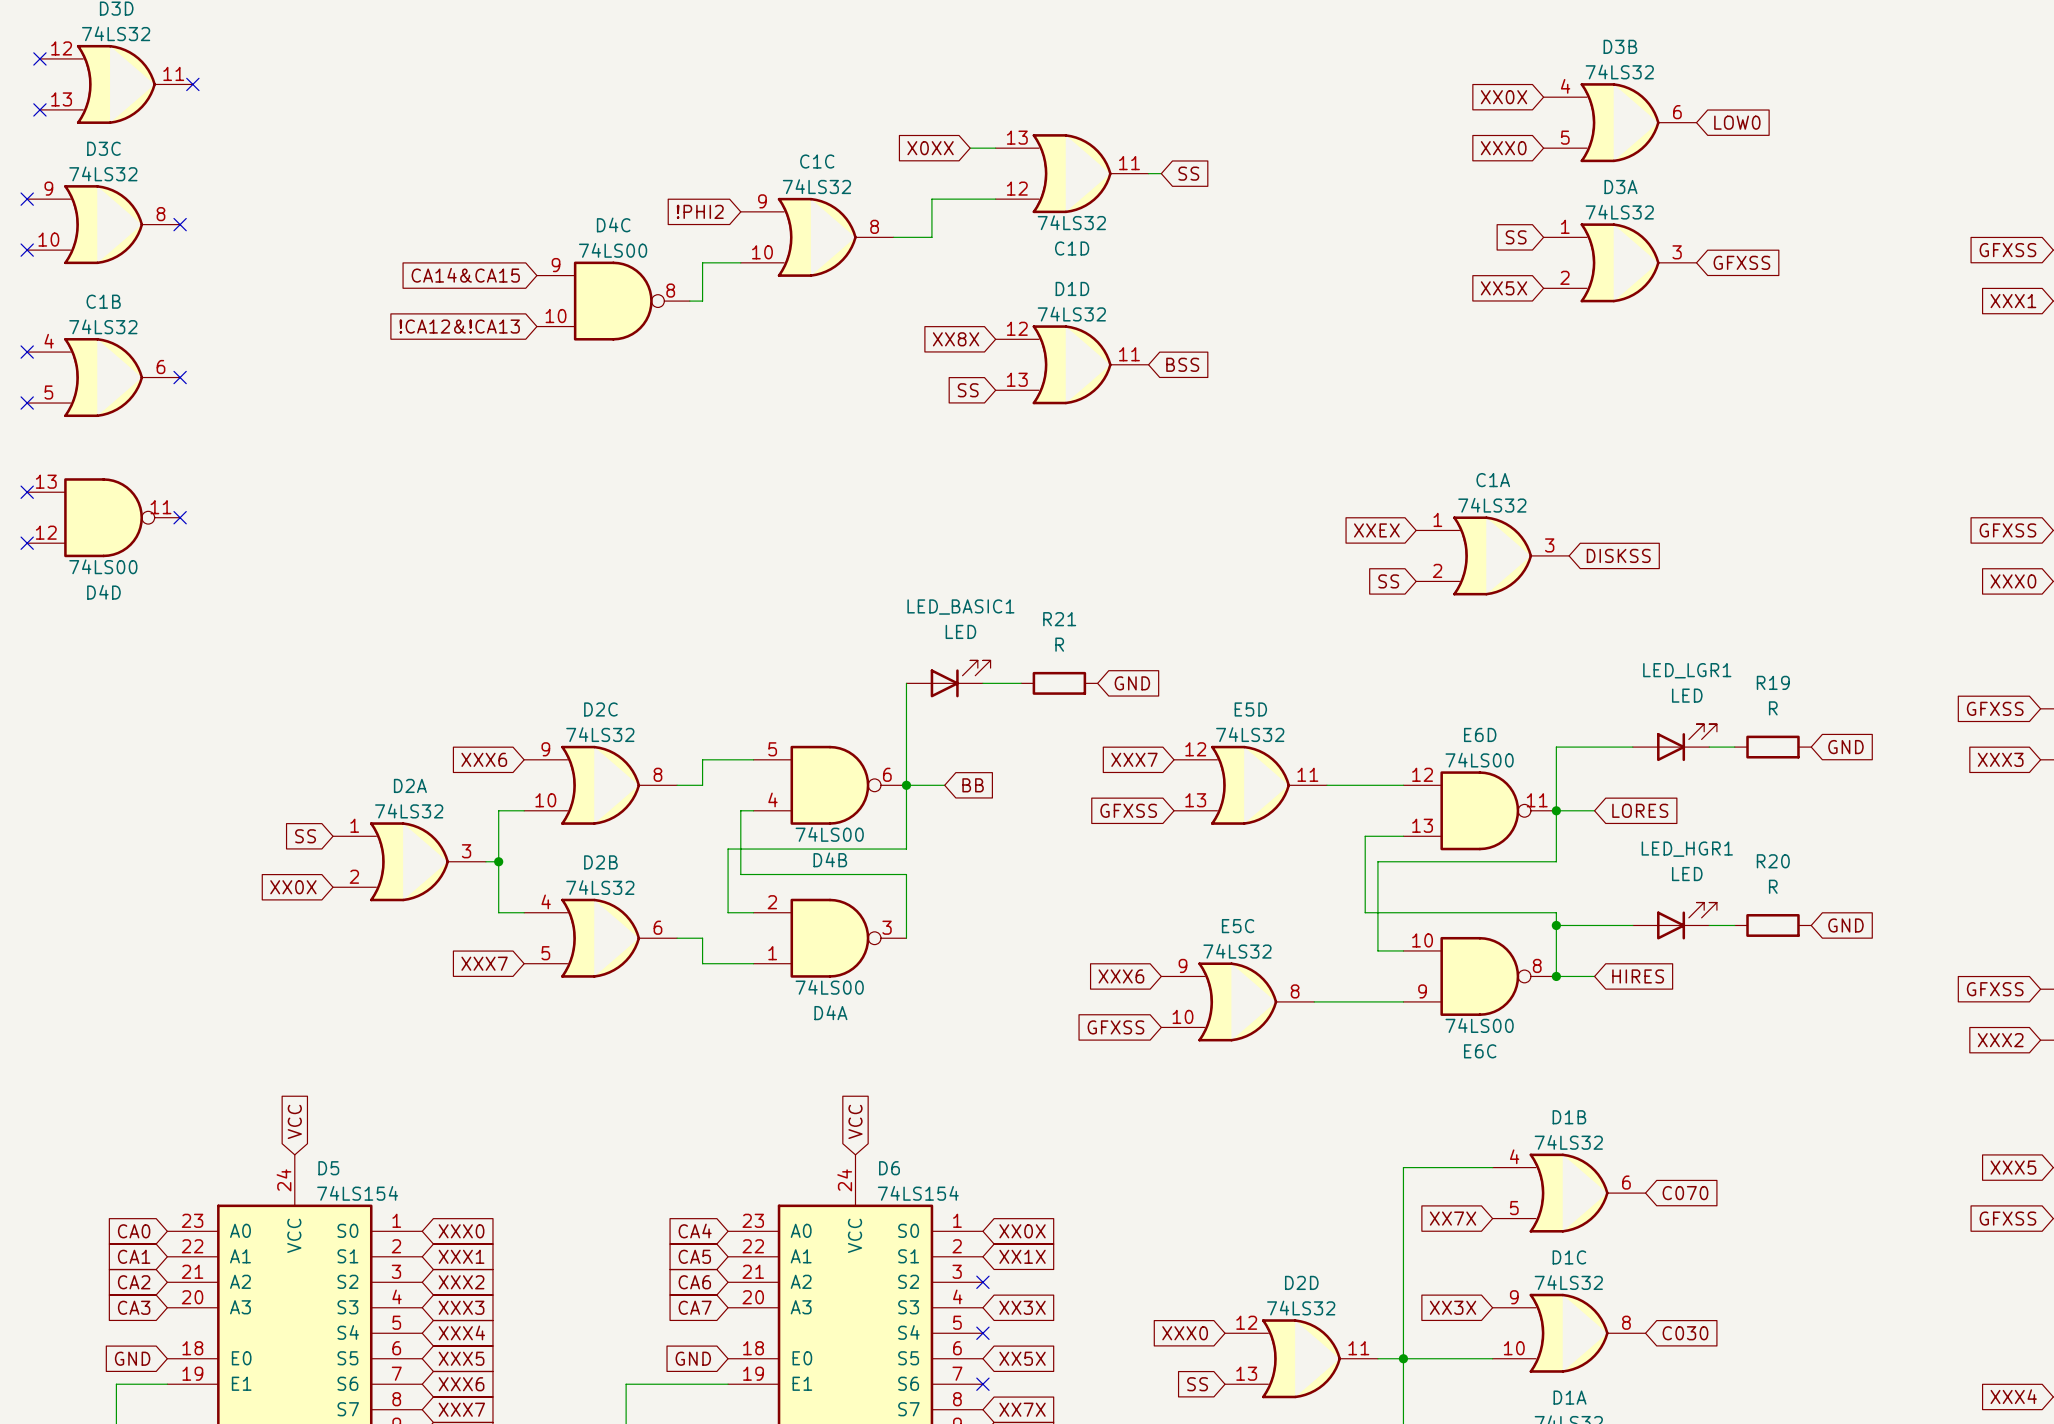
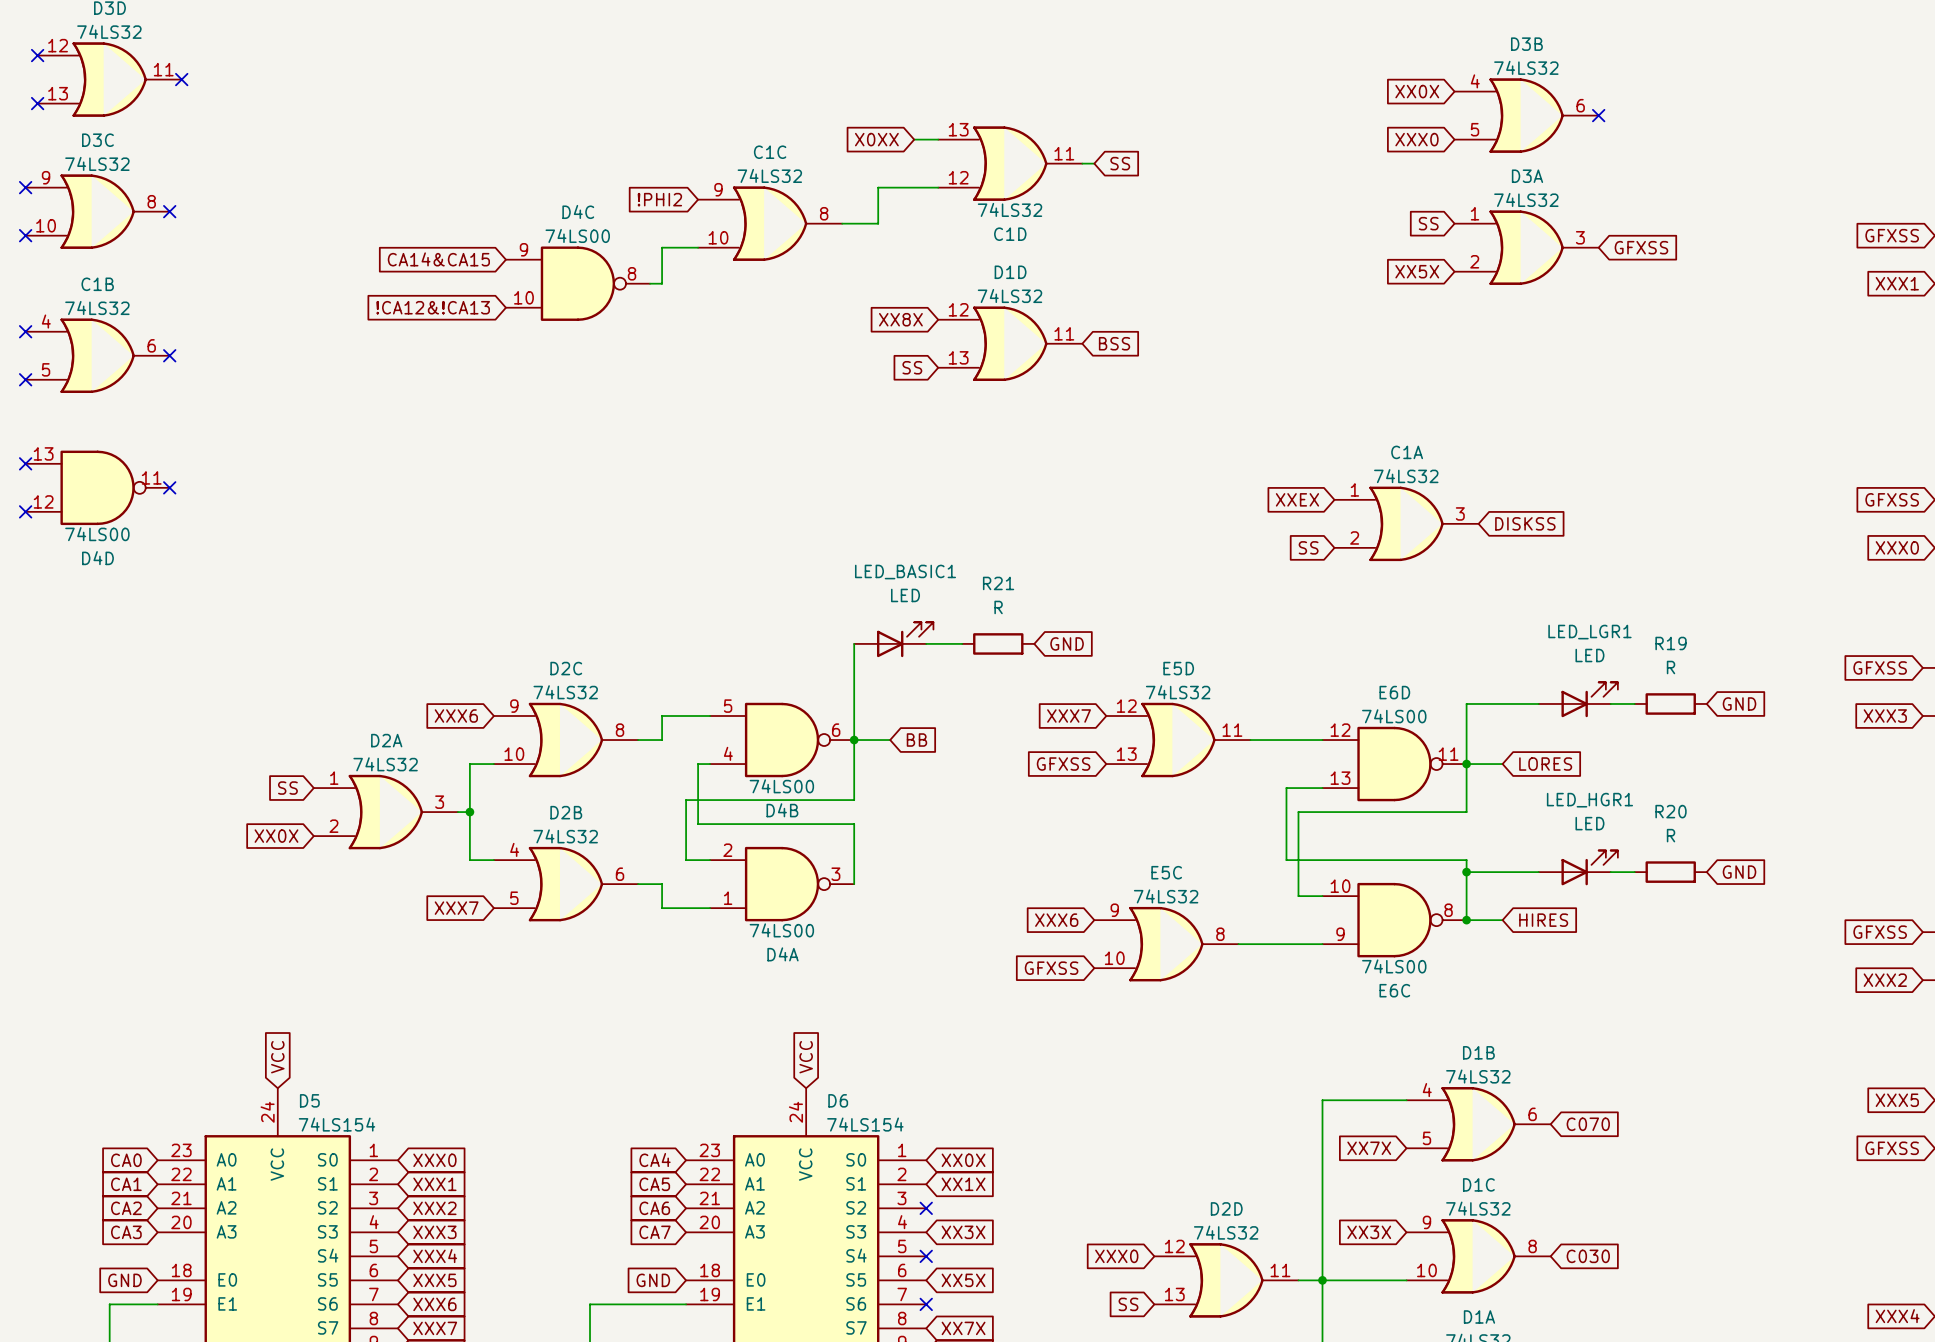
no-connect mark: none -> (1598, 115)
global label: LOW0 (1737, 122) -> none

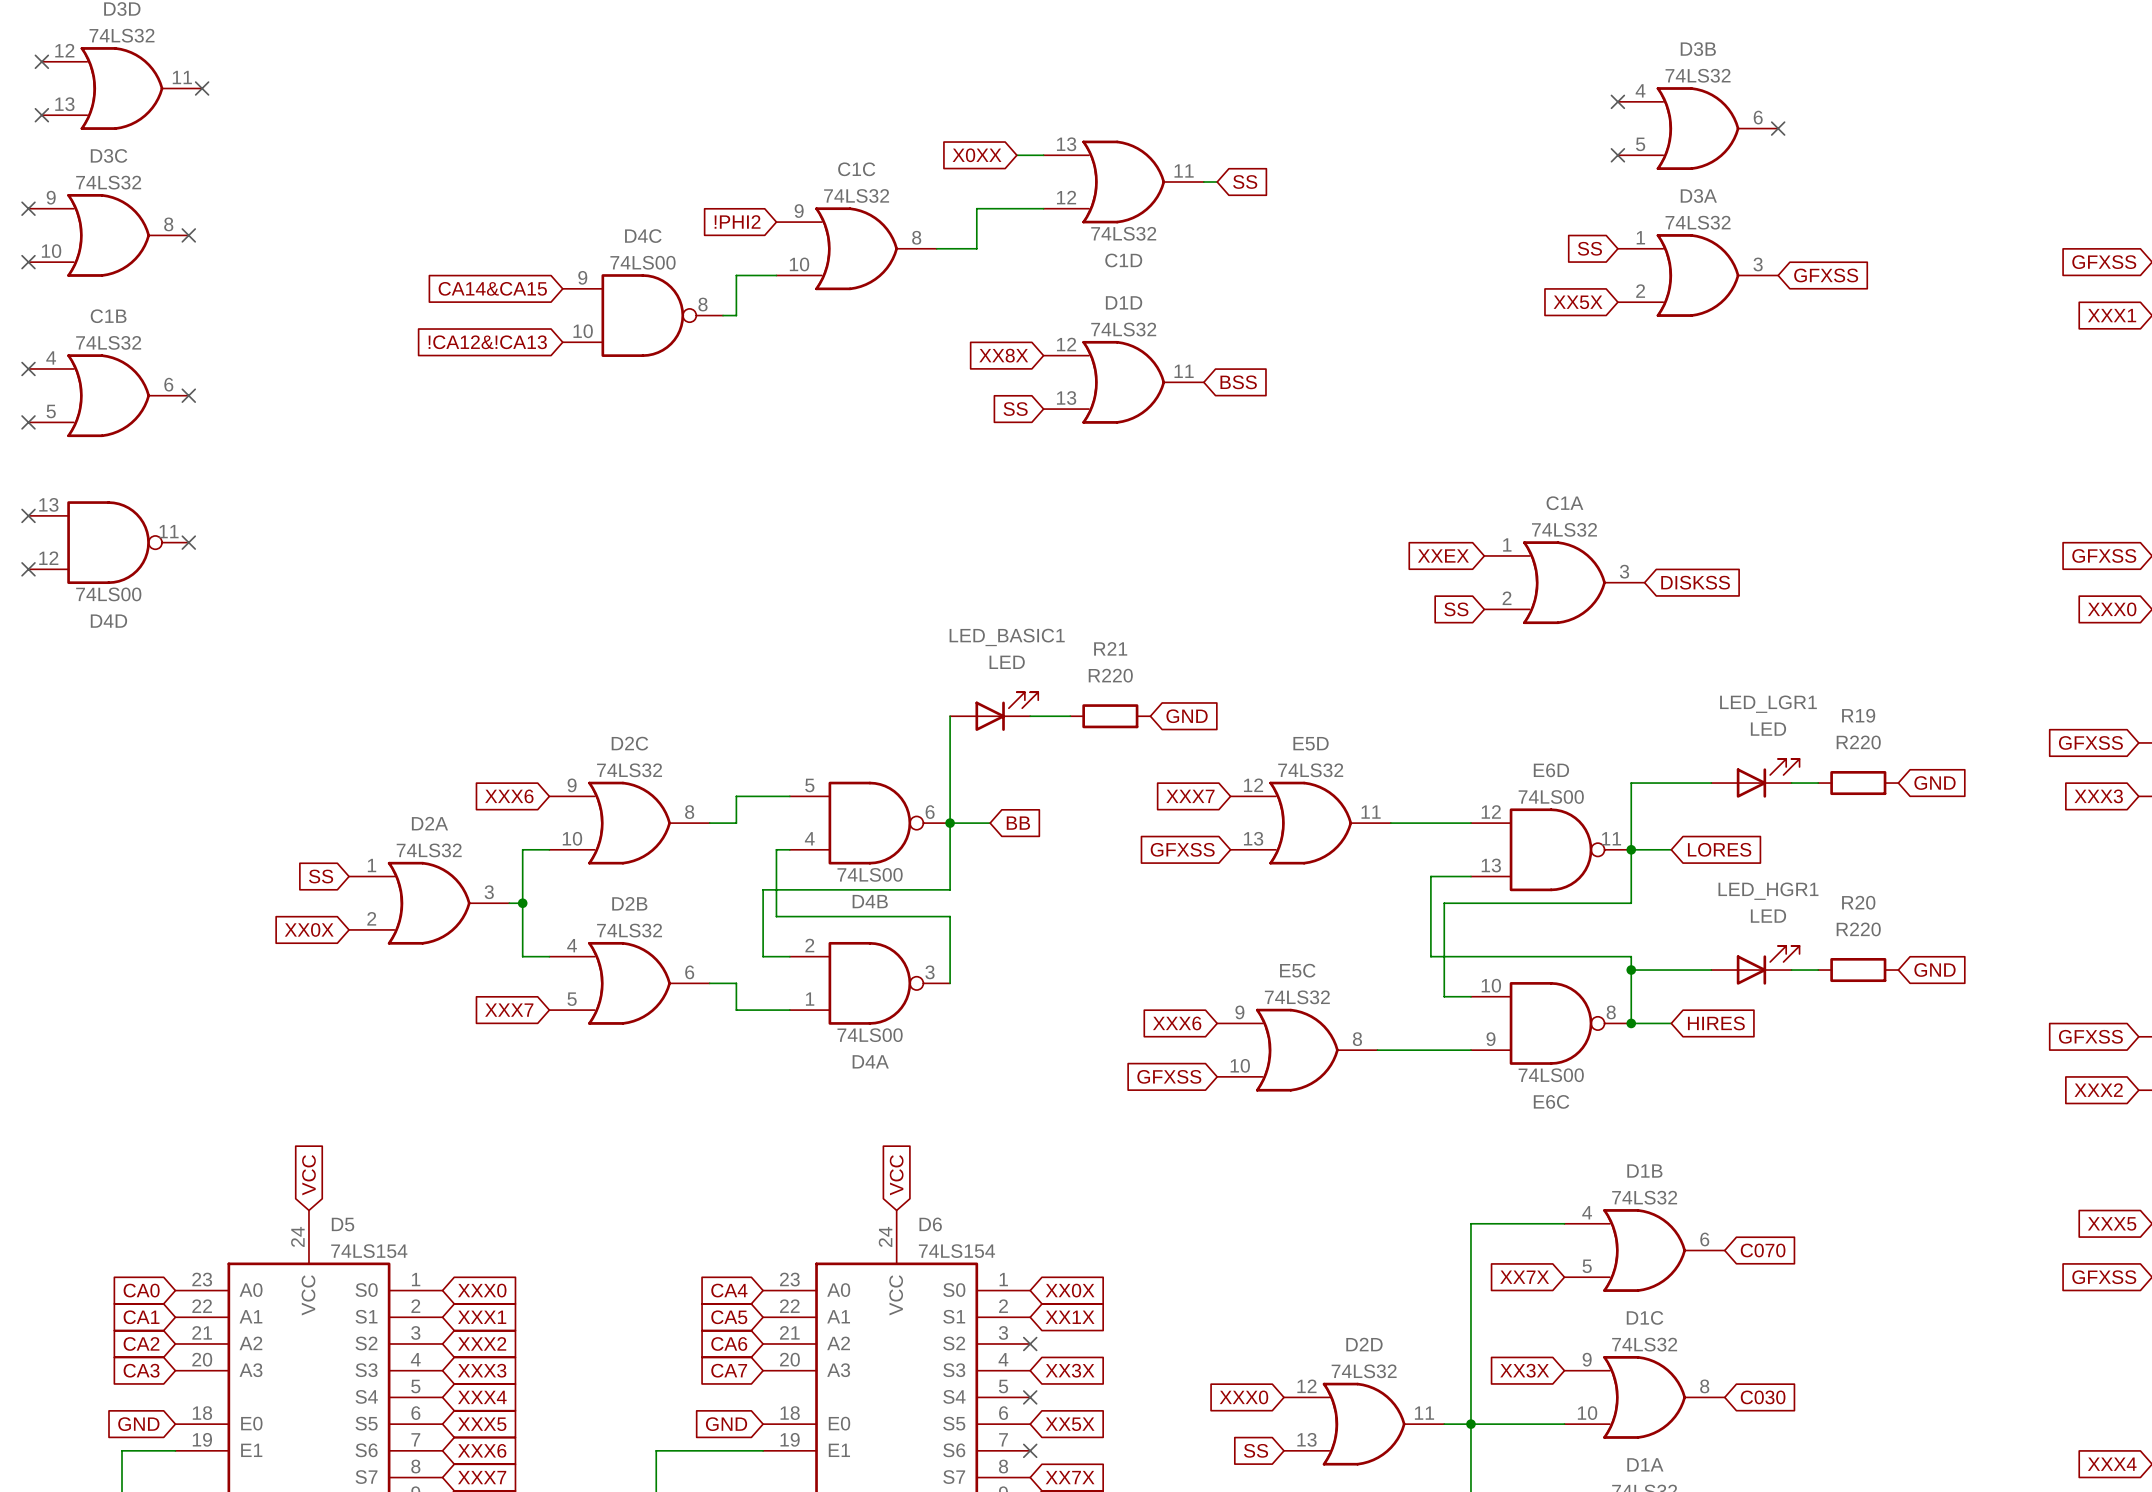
global label: XX0X (1417, 91) -> none
no-connect mark: none -> (1617, 101)
global label: XXX0 (1416, 139) -> none
no-connect mark: none -> (1617, 155)
R21 value: R (998, 607) -> R220 (1110, 675)
R19 value: R (1671, 667) -> R220 (1858, 742)
R20 value: R (1671, 835) -> R220 (1858, 929)

